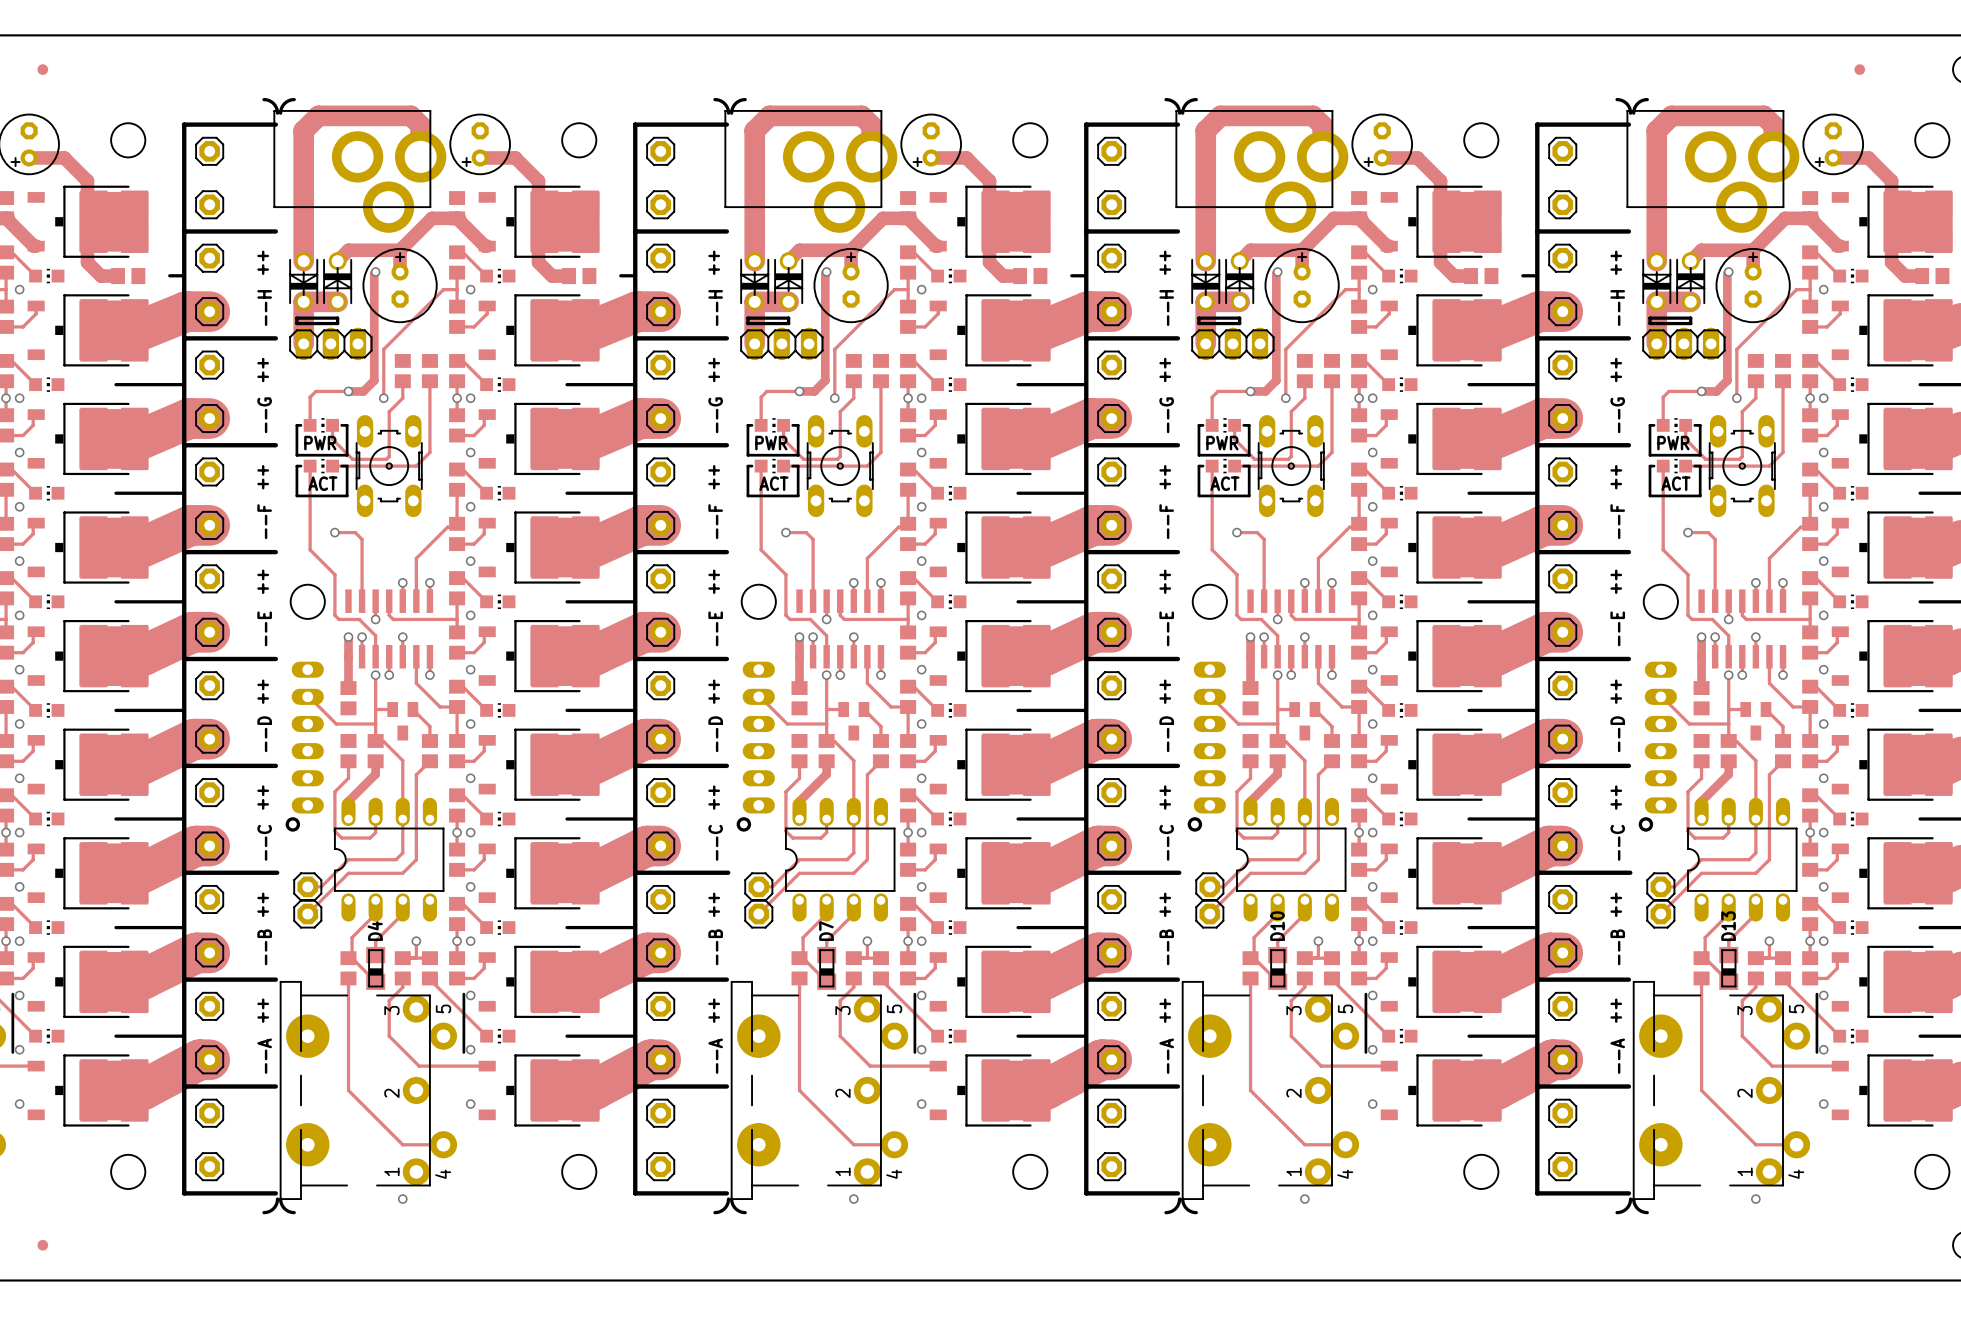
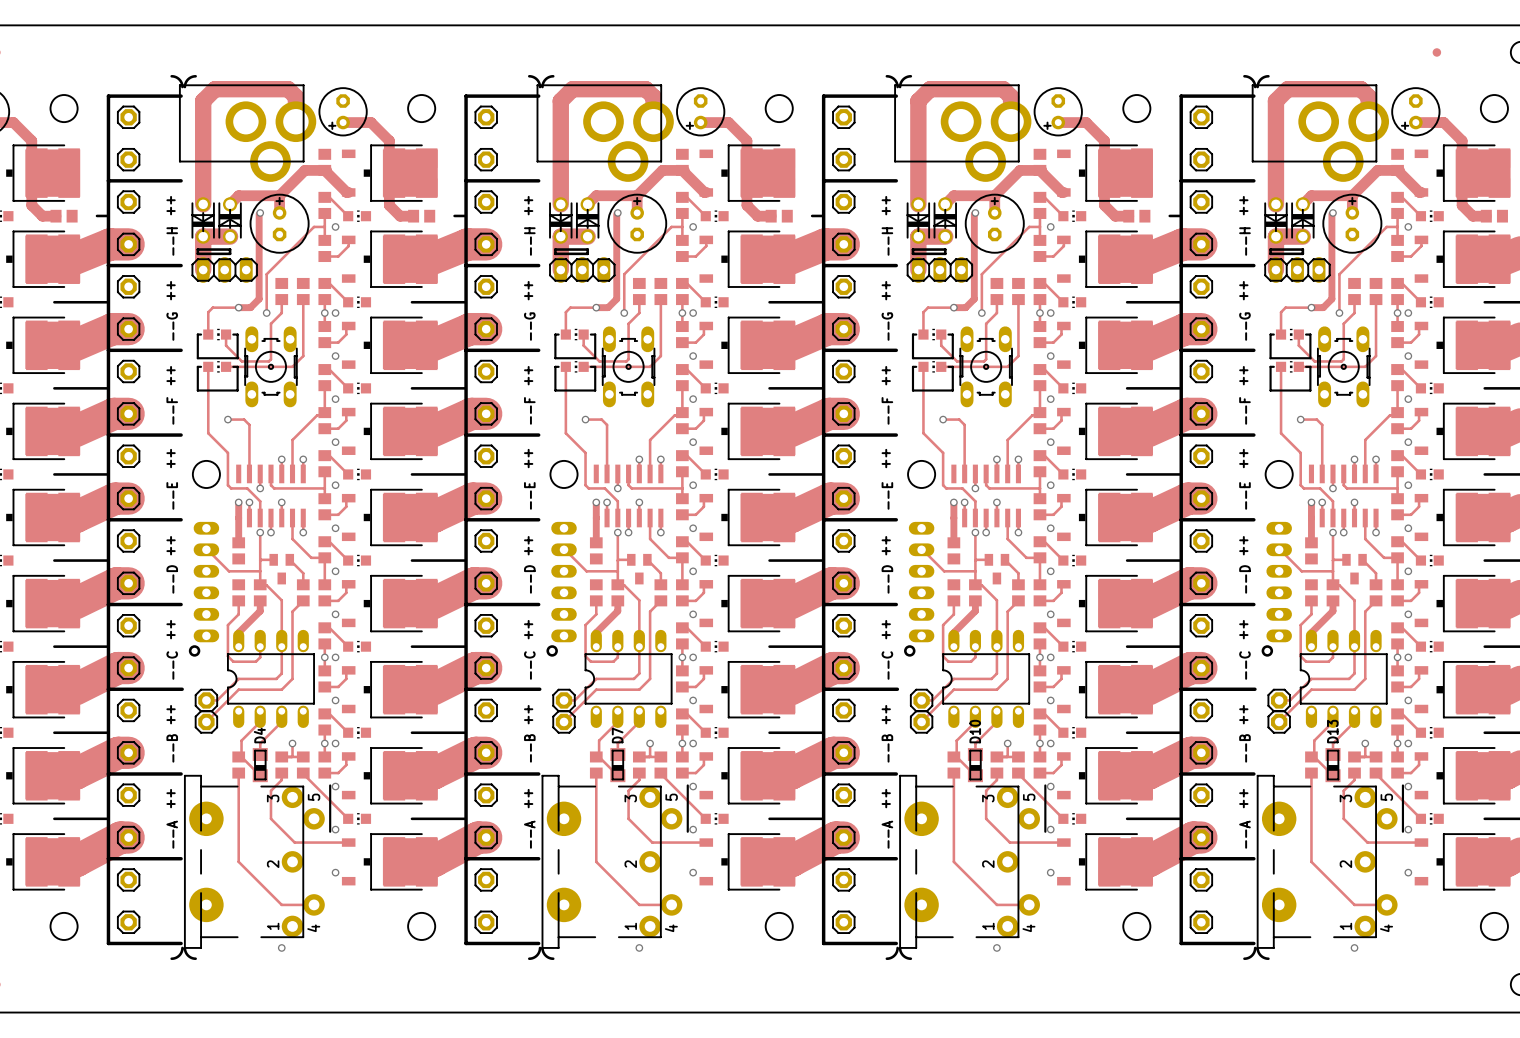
text: PWR (320, 443) -> none
text: PWR (771, 443) -> none
text: PWR (1222, 443) -> none
text: PWR (1673, 443) -> none
text: ACT (322, 483) -> none
text: ACT (773, 483) -> none
text: ACT (1224, 483) -> none
text: ACT (1675, 483) -> none

